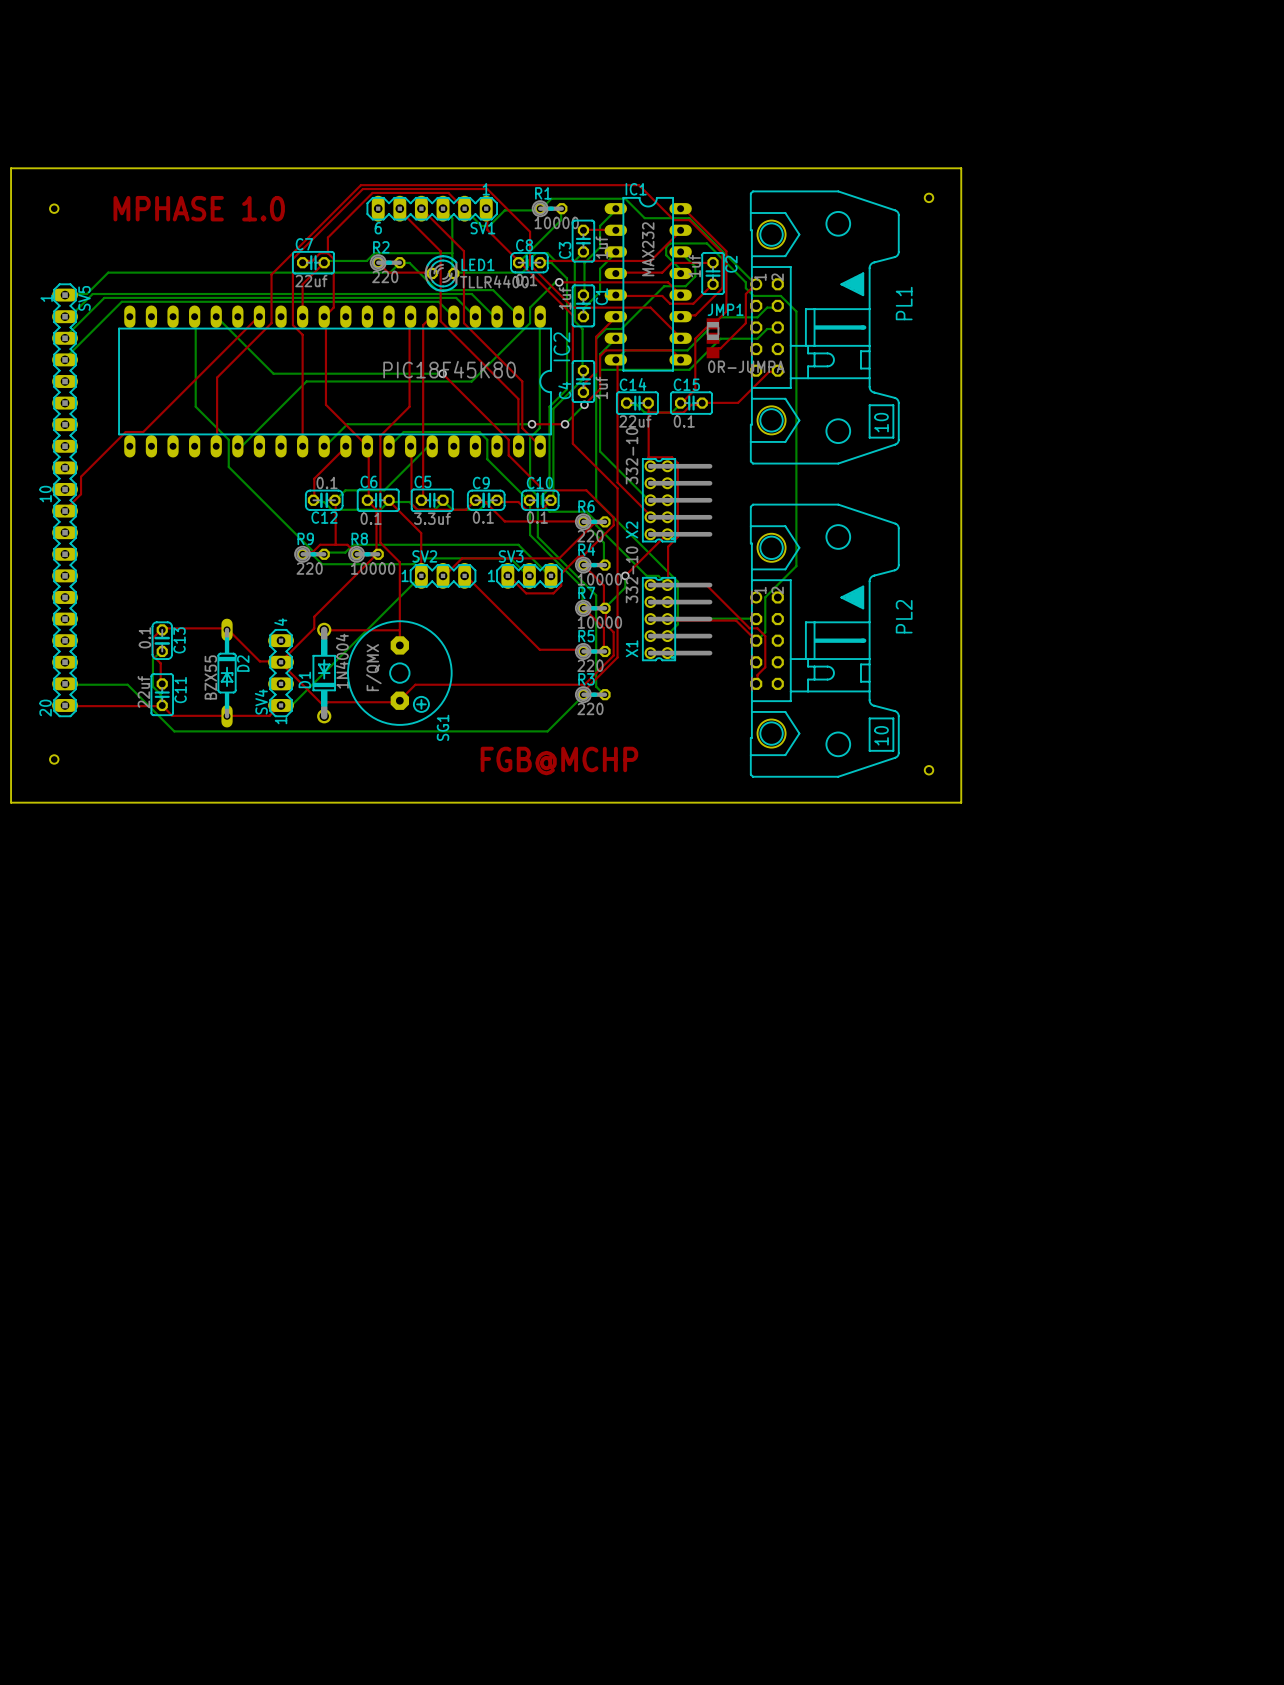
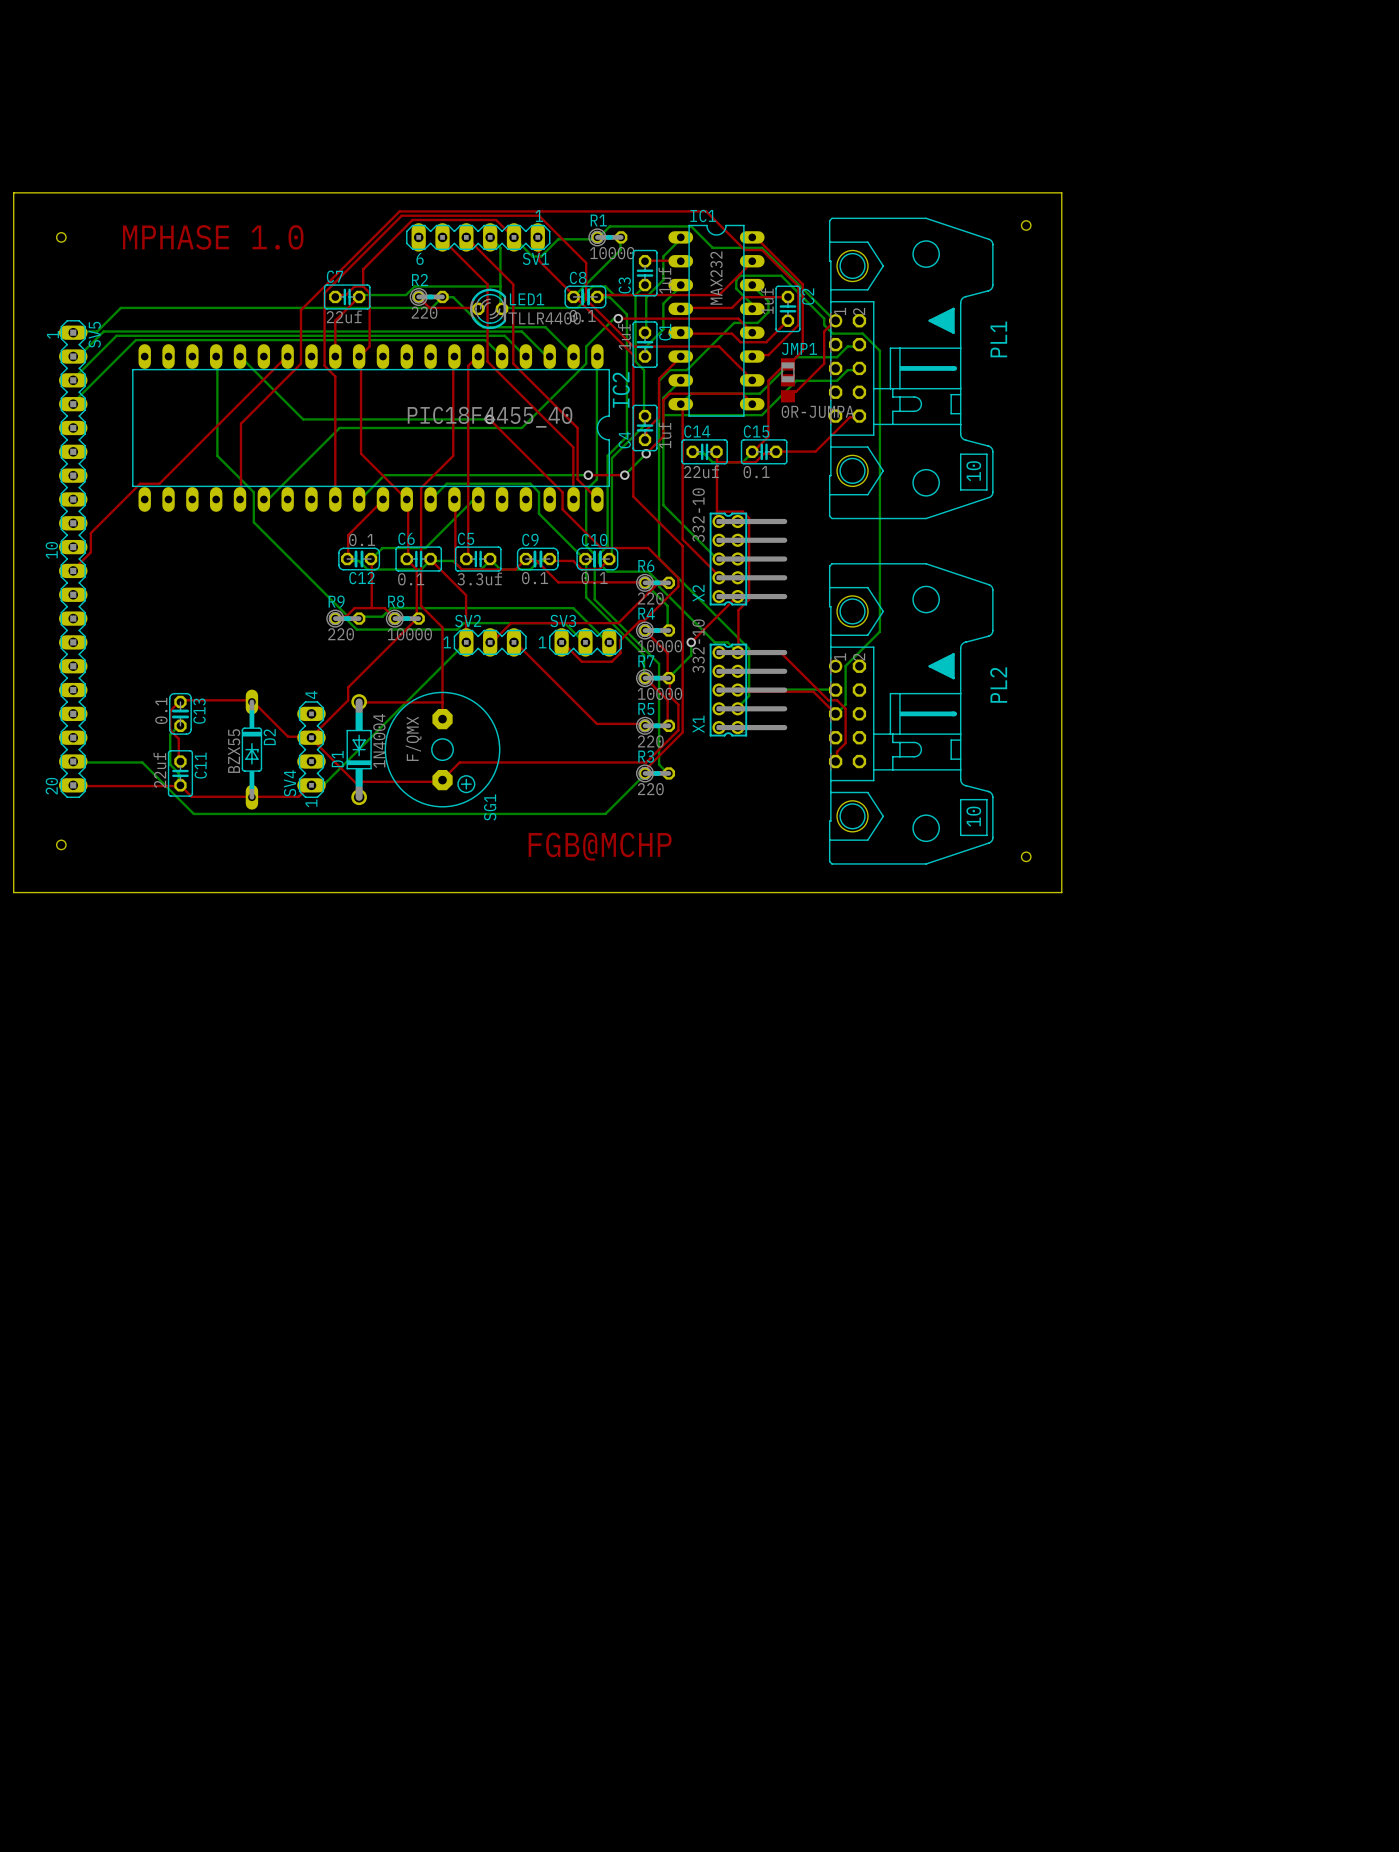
IC2 value: PIC18F45K80 (449, 369) -> PIC18F4455_40 (490, 417)

